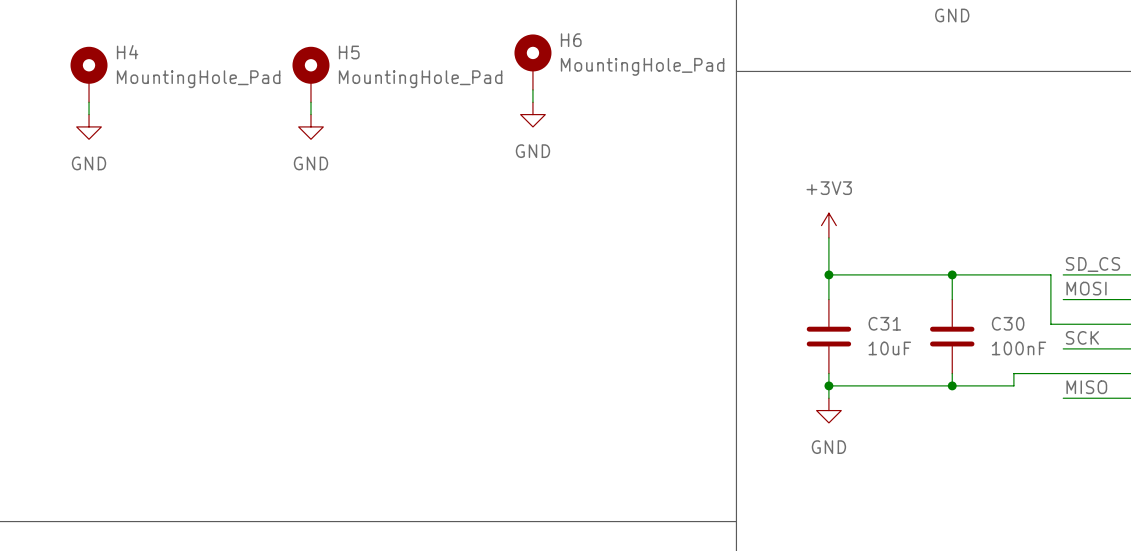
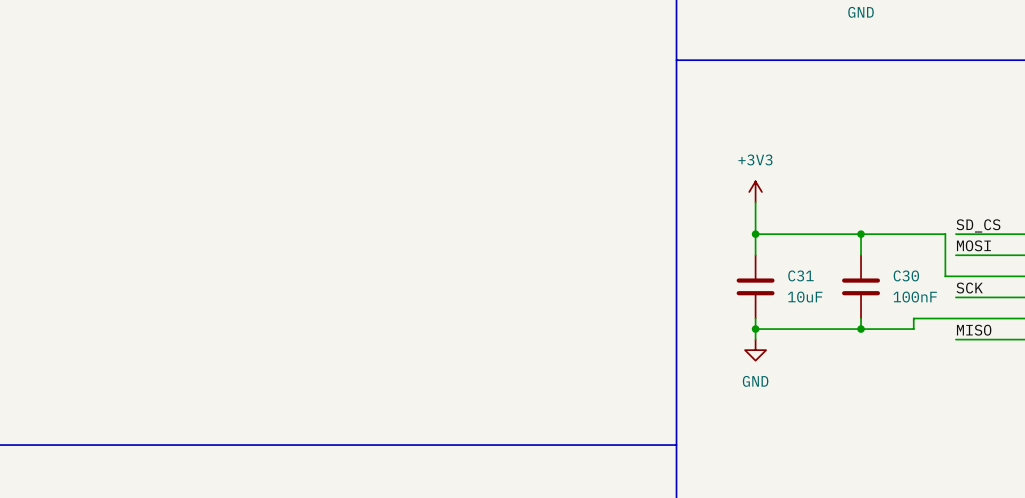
H6: MountingHole_Pad (532, 62) -> none
H4: MountingHole_Pad (89, 74) -> none
H5: MountingHole_Pad (310, 74) -> none
wire: (532, 89) (532, 102) -> none
wire: (89, 102) (89, 114) -> none
wire: (310, 102) (310, 114) -> none
power symbol: GND (532, 114) -> none
power symbol: GND (89, 126) -> none
power symbol: GND (310, 126) -> none

